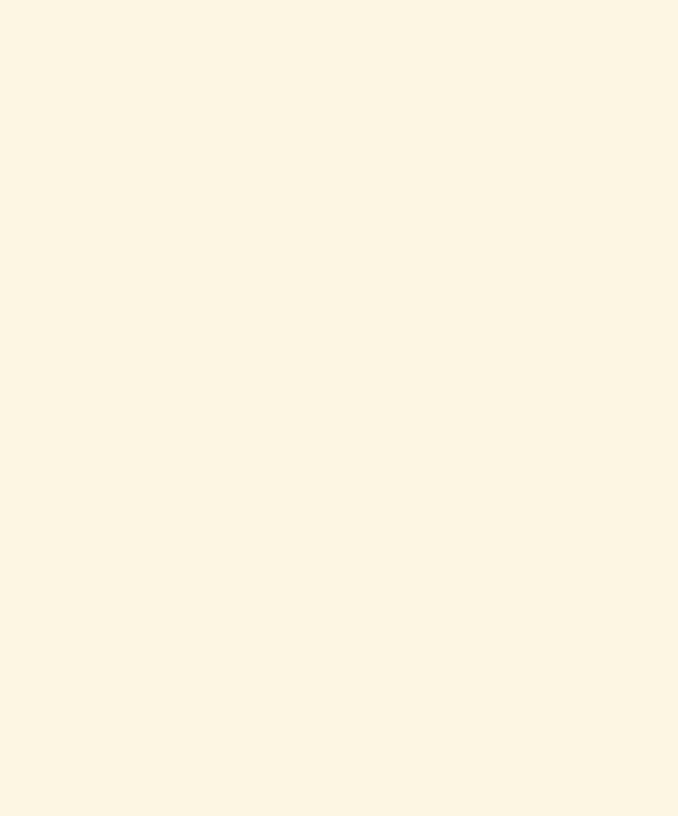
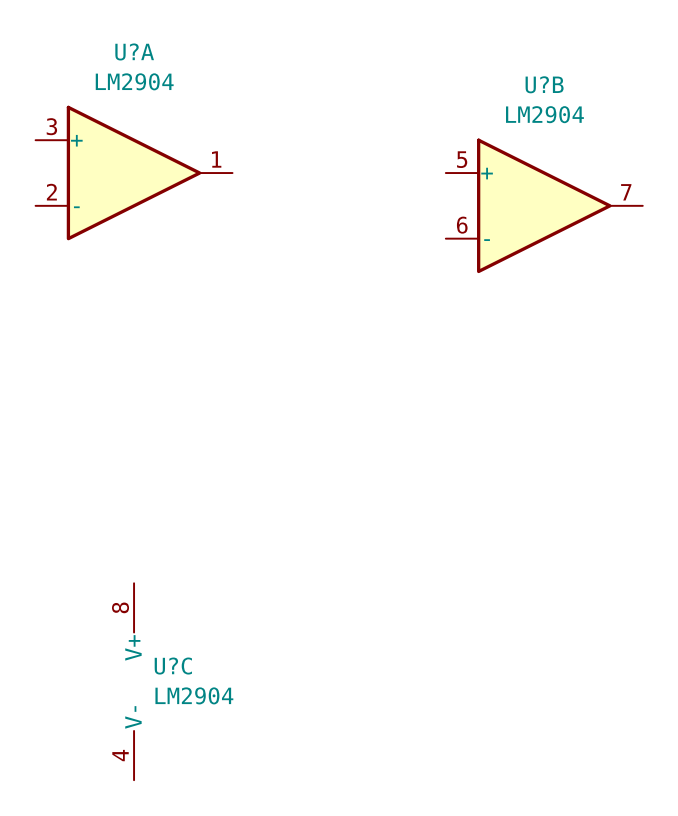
U?A: none -> LM2904 (134, 173)
U?B: none -> LM2904 (544, 205)
U?C: none -> LM2904 (134, 681)

